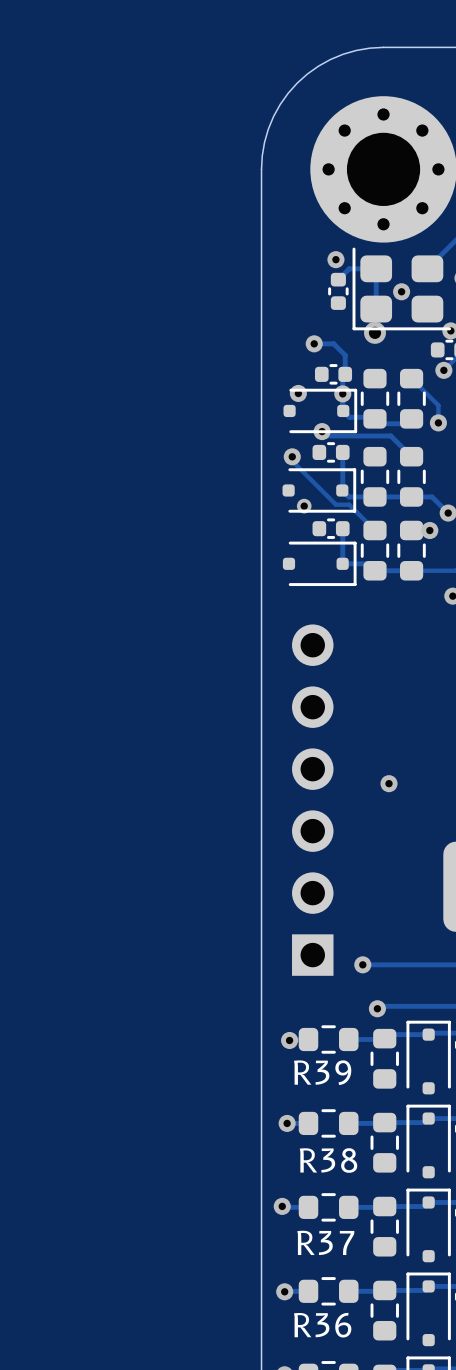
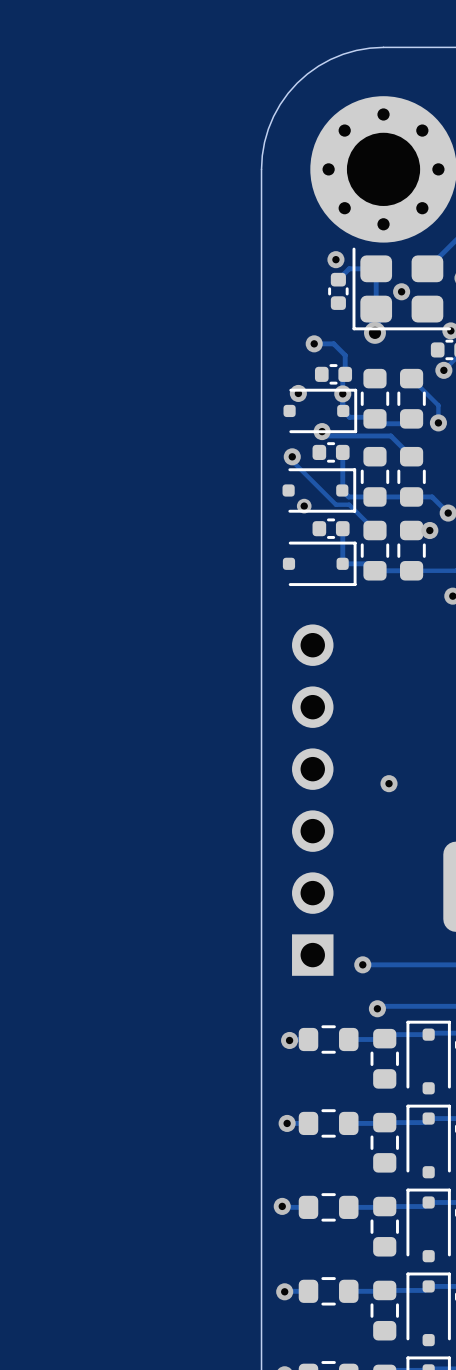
R39 name: R39 (322, 1072) -> none
R38 name: R38 (328, 1160) -> none
R37 name: R37 (325, 1242) -> none
R36 name: R36 (322, 1325) -> none

